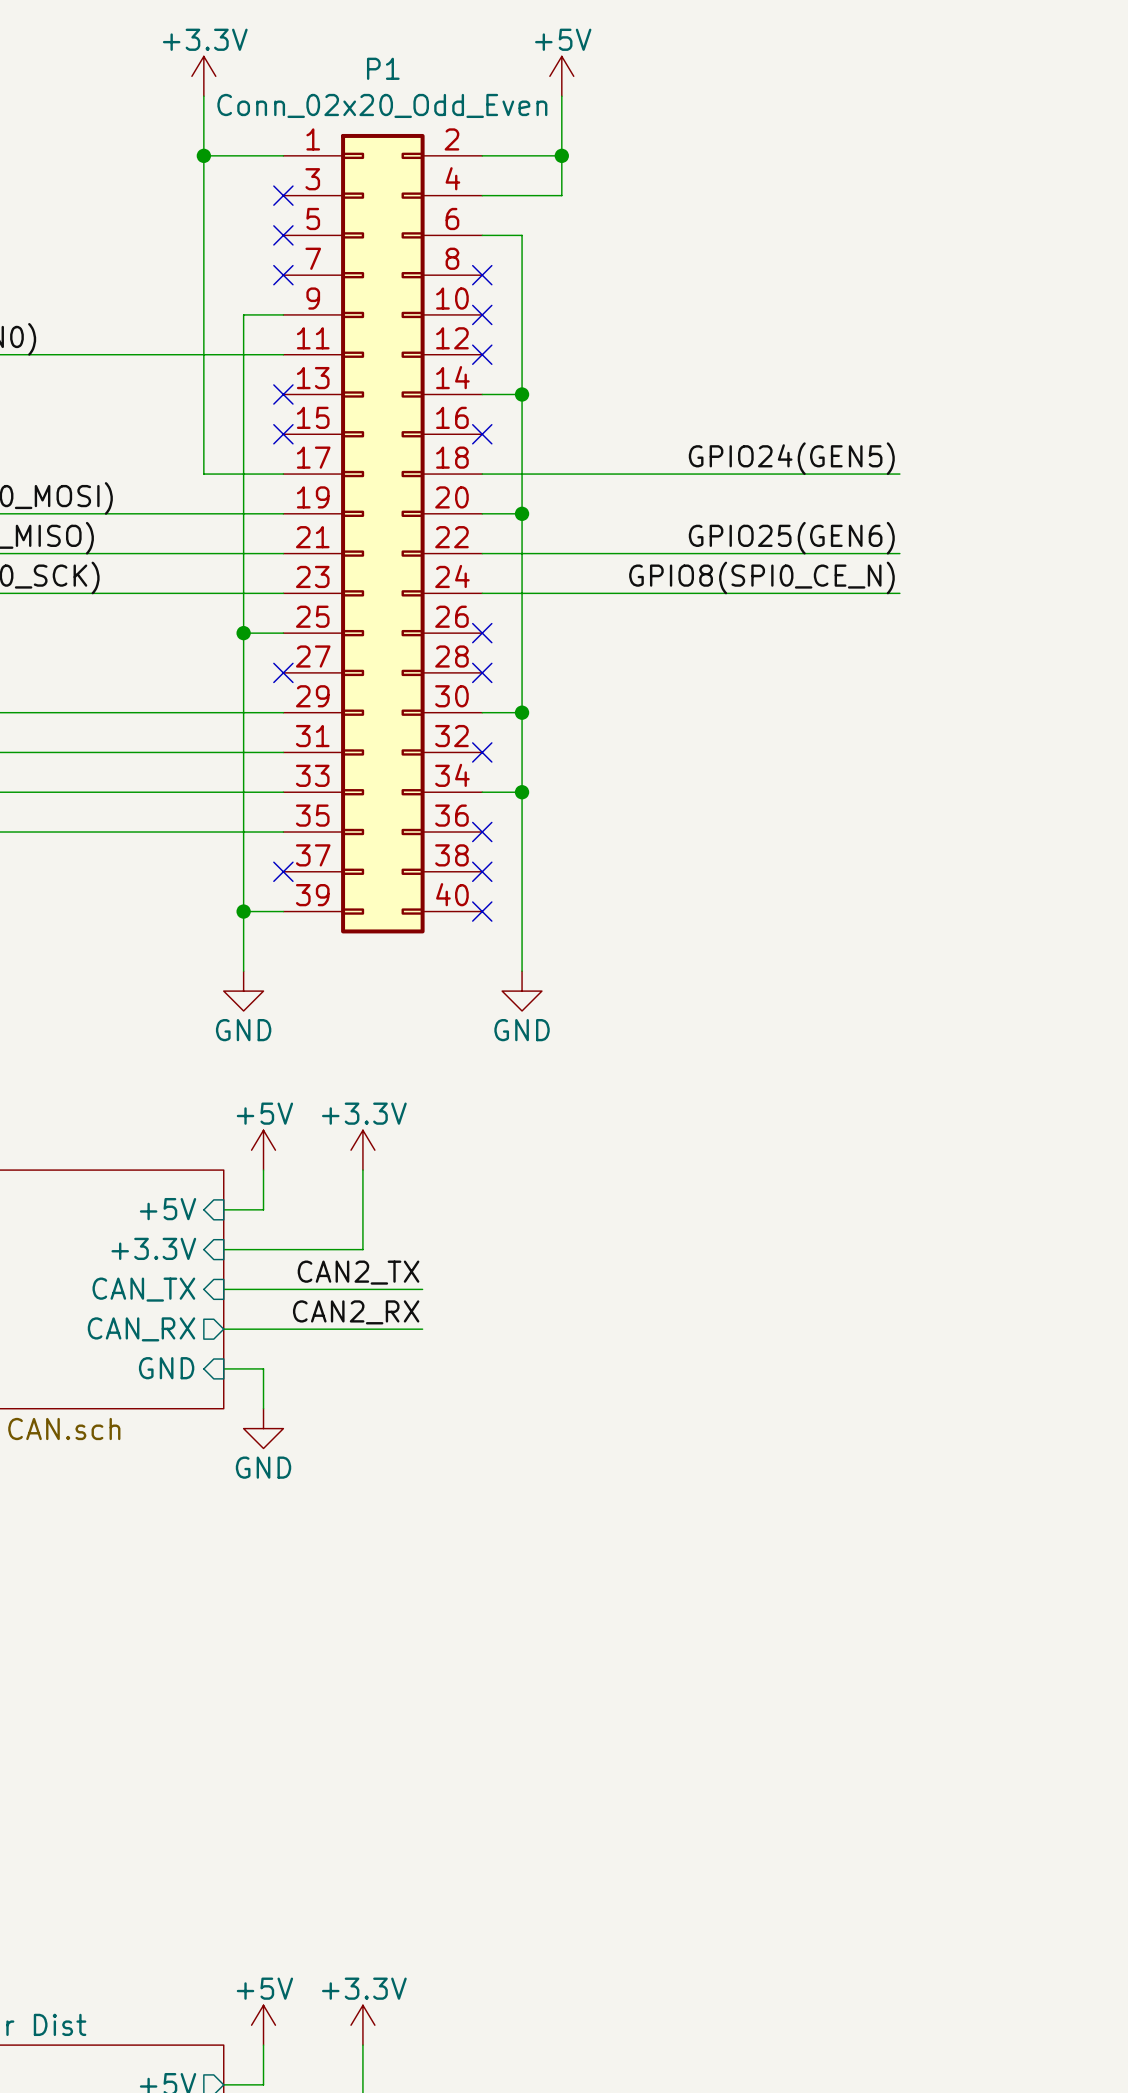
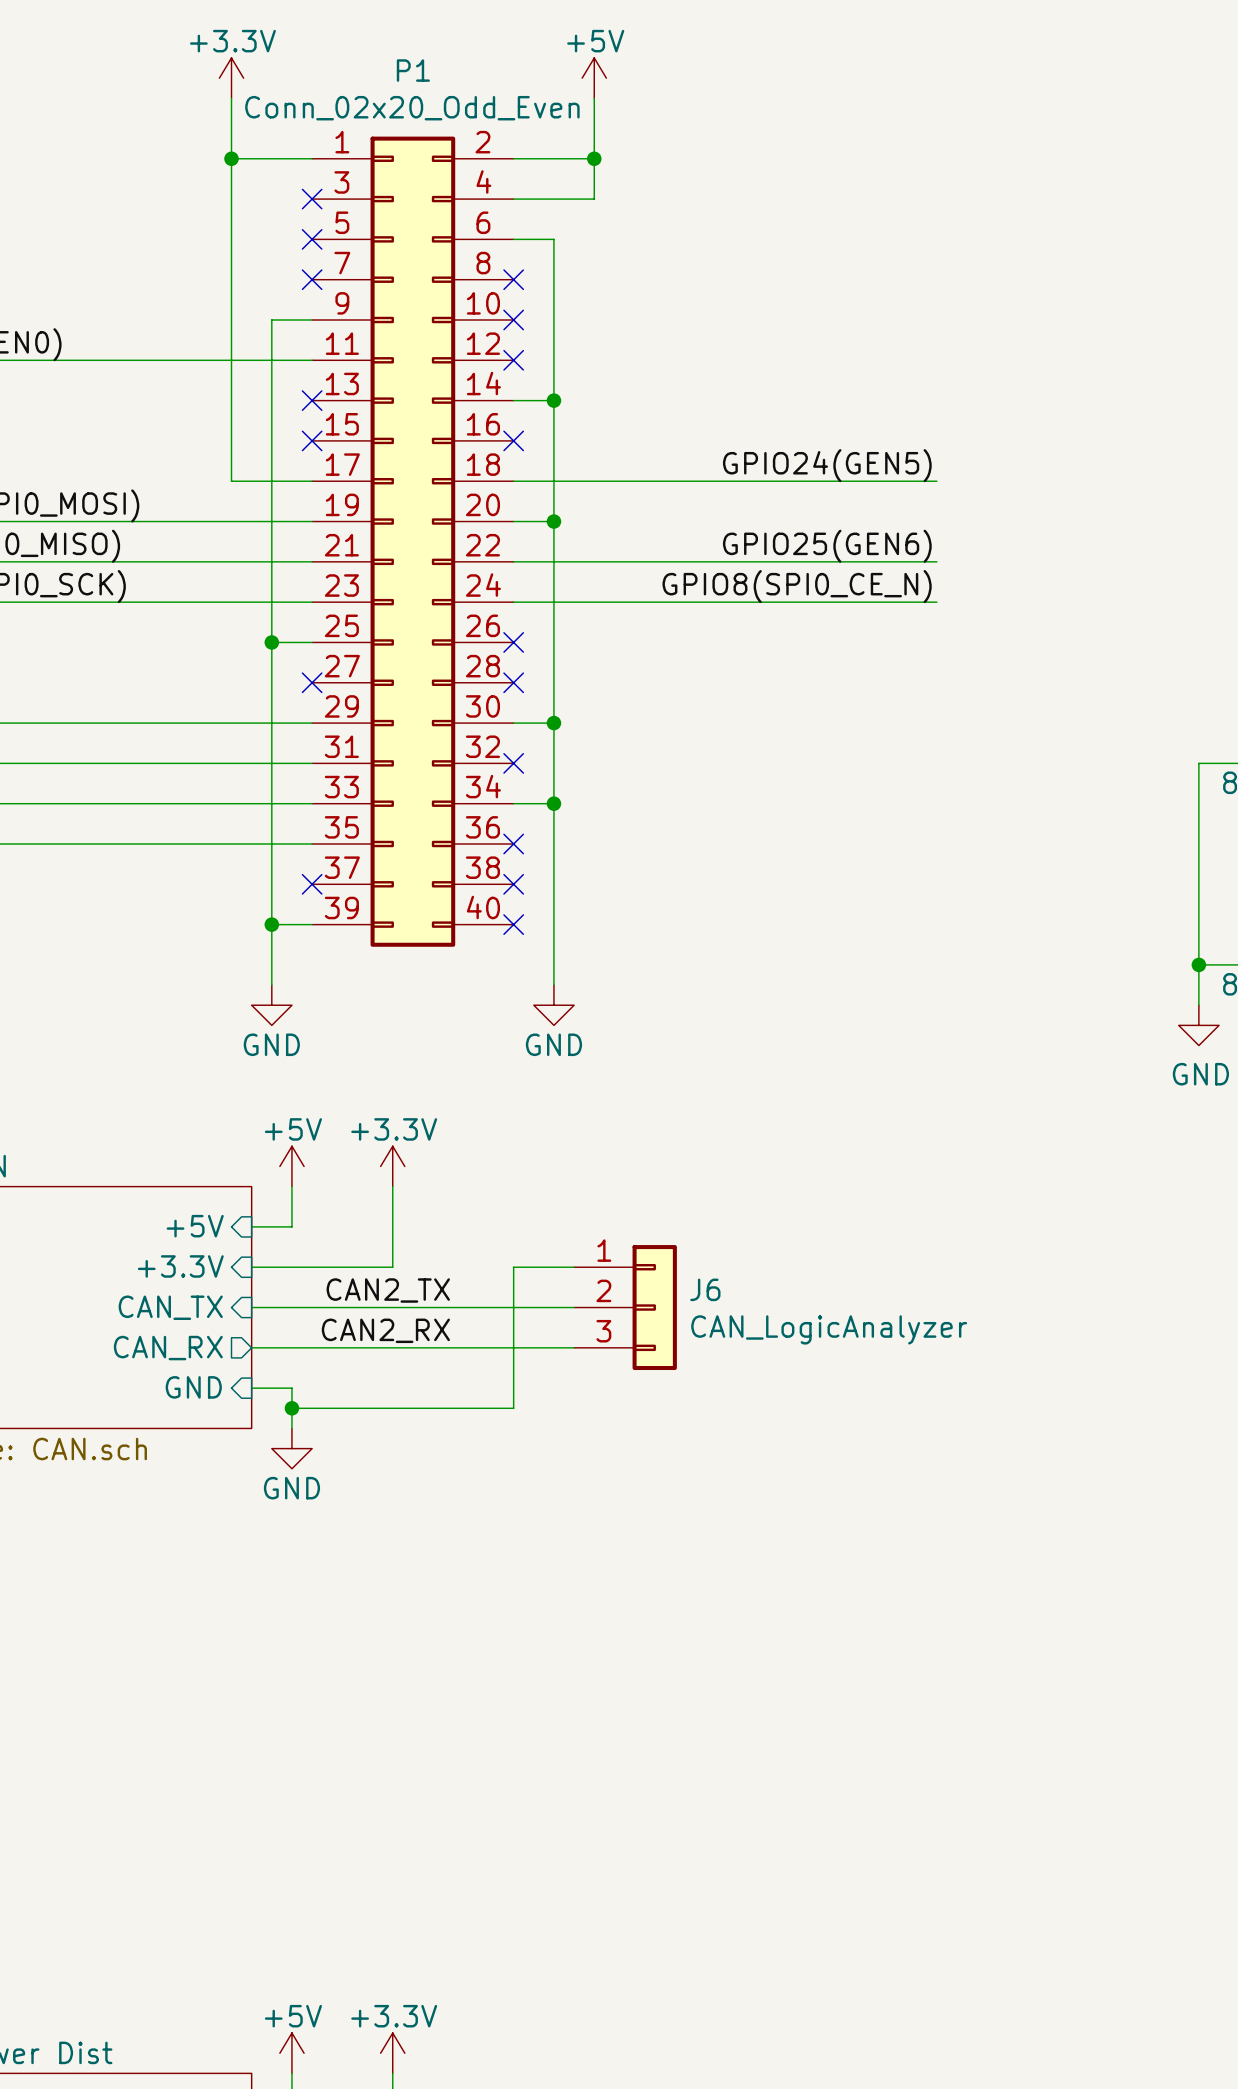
wire: none -> (574, 1267) (513, 1267) (513, 1408) (291, 1408)
wire: none -> (453, 1307) (574, 1307)
J6: none -> CAN_LogicAnalyzer (625, 1307)
wire: none -> (453, 1347) (574, 1347)
junction: none -> (291, 1408)

